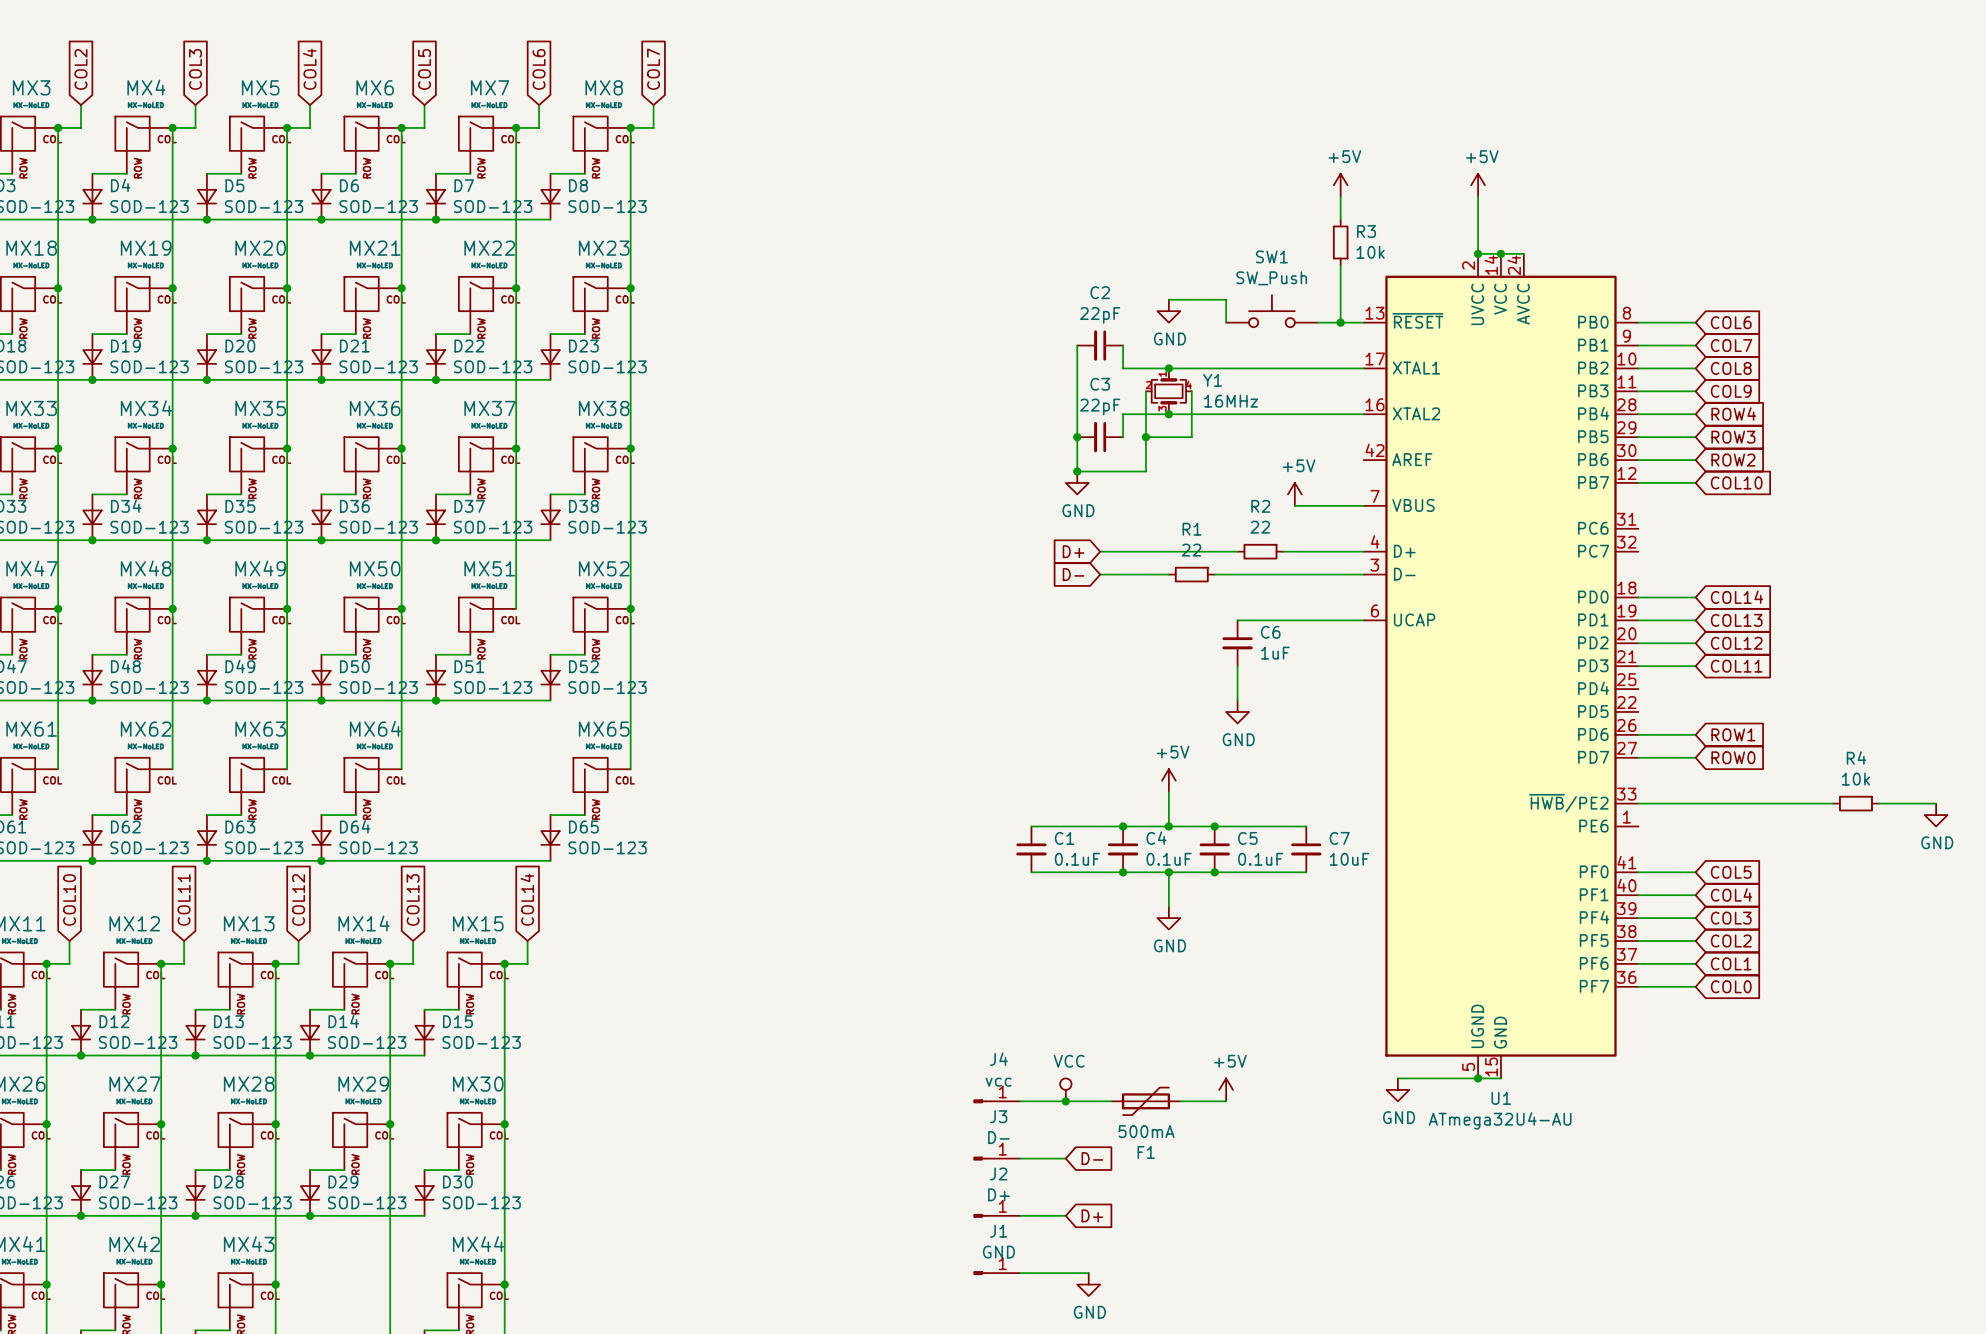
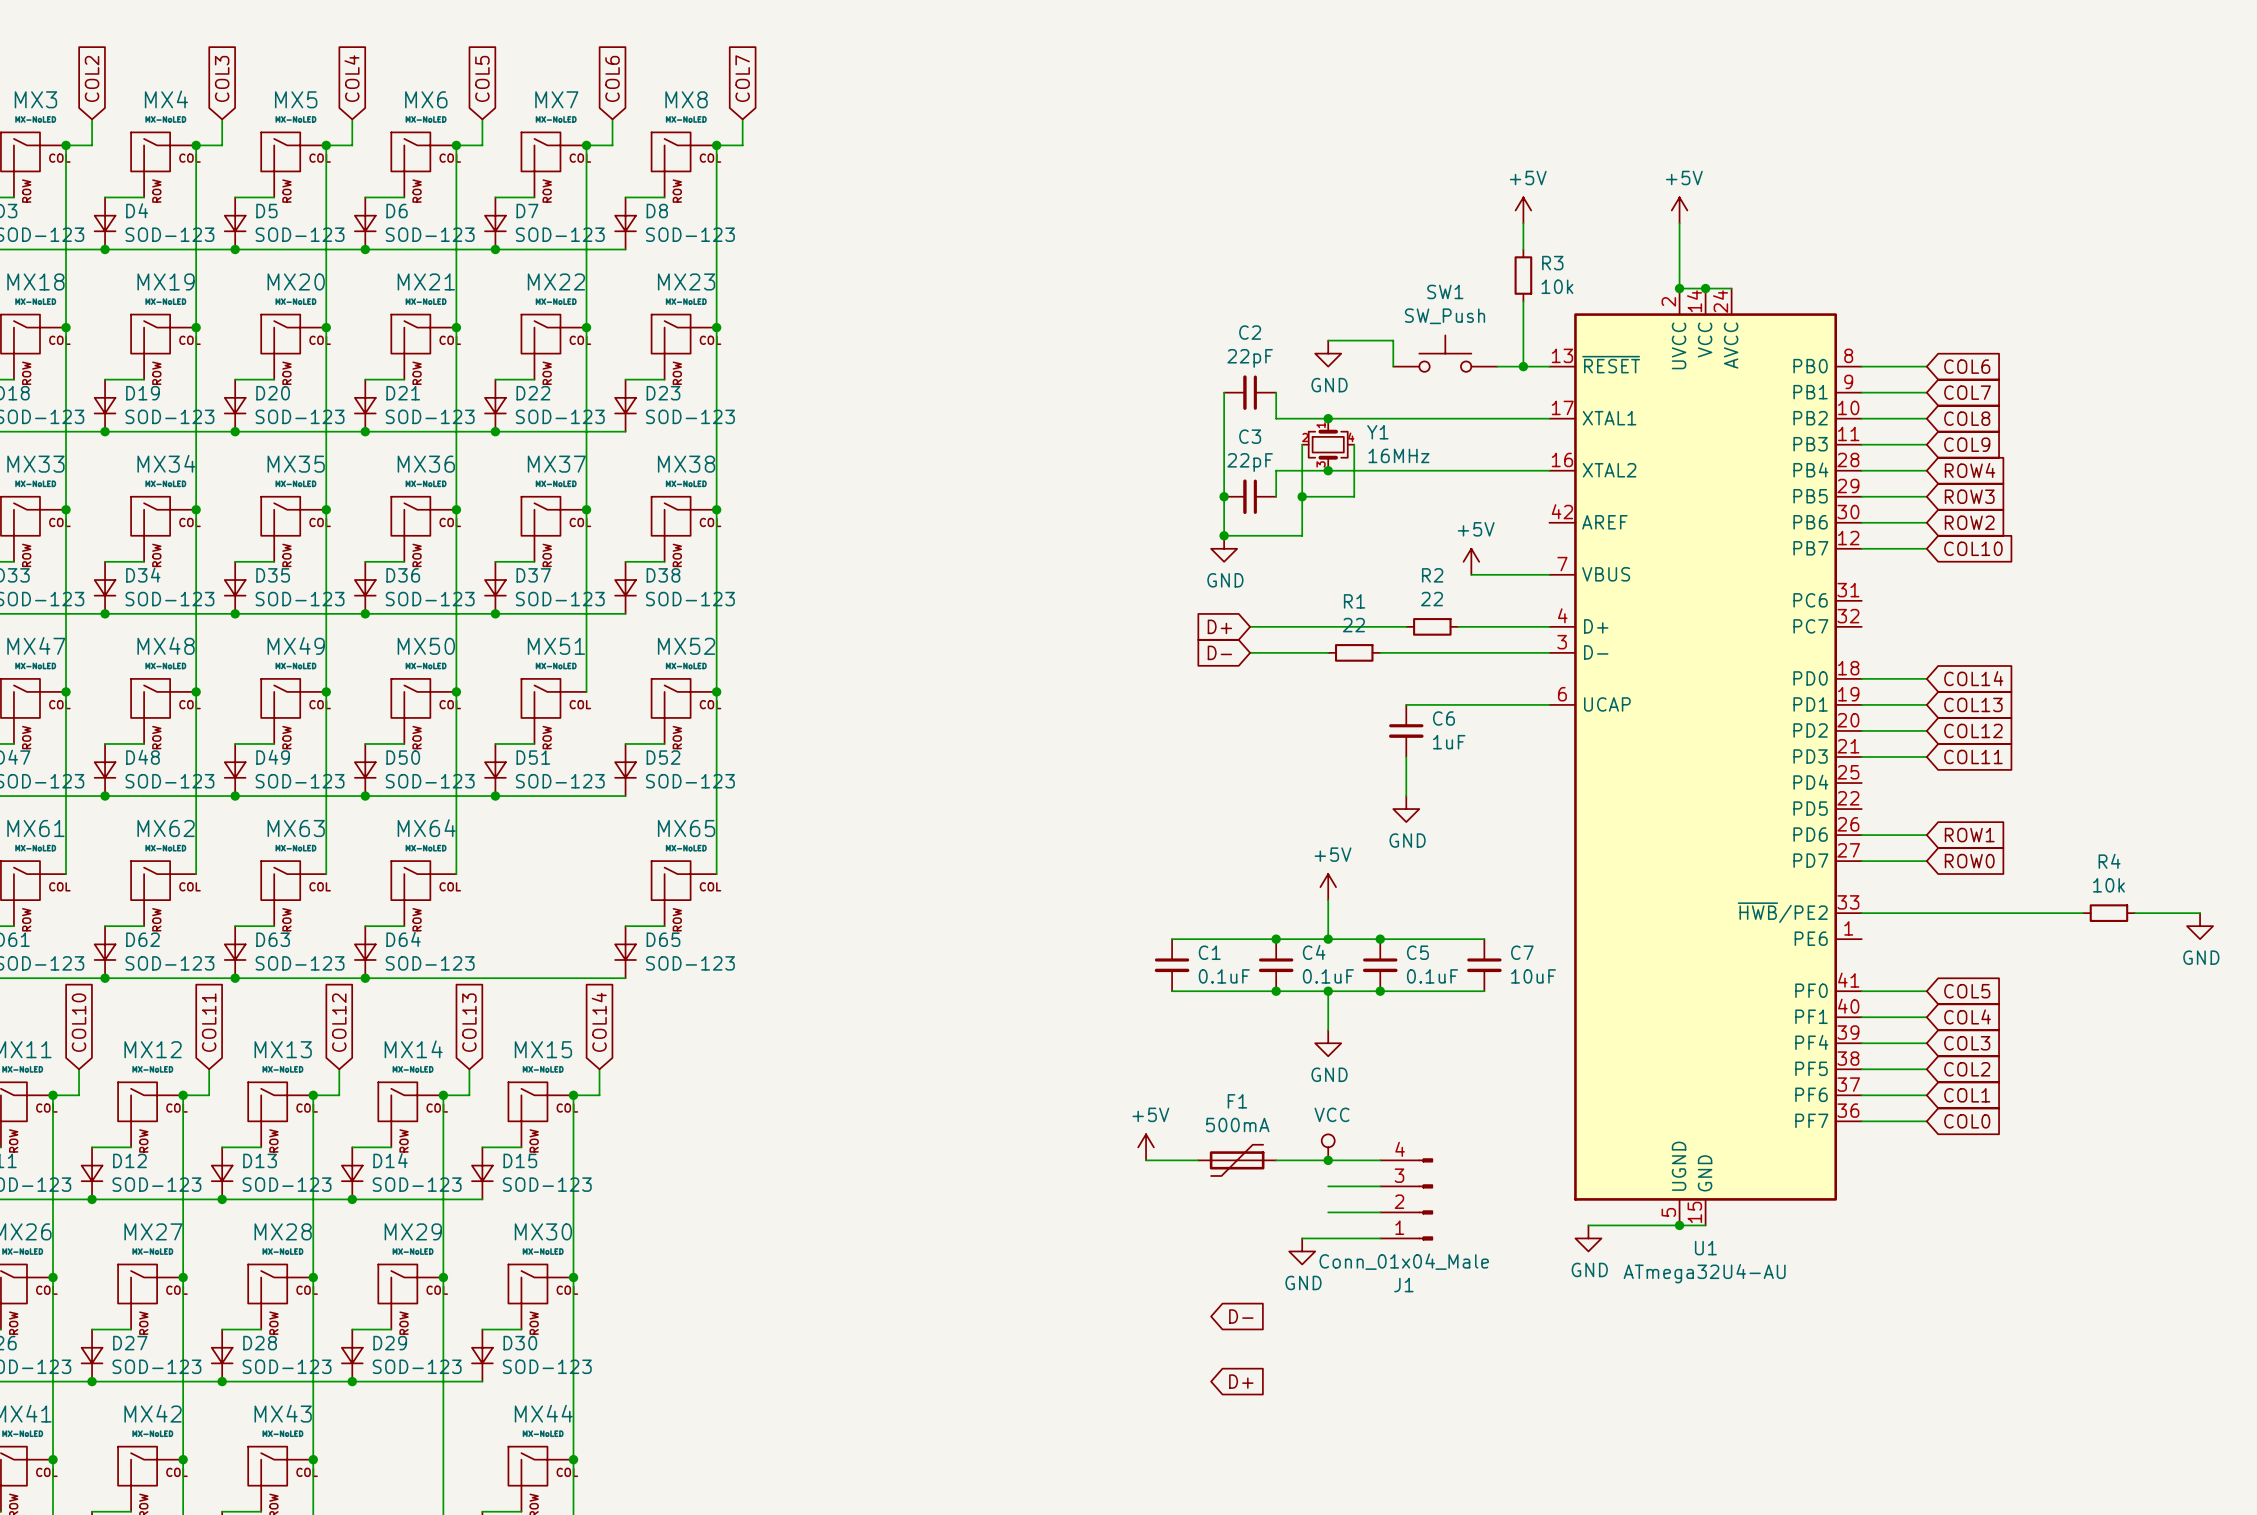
power symbol: none -> +5V (1146, 1147)
junction: none -> (1328, 1160)
wire: none -> (1328, 1186) (1380, 1186)
power symbol position: VCC (1065, 1089) -> VCC (1328, 1147)
power symbol: +5V (1226, 1089) -> none
J4: vcc (996, 1101) -> none
wire: (1020, 1101) (1111, 1101) -> (1276, 1160) (1380, 1160)
junction: (1065, 1101) -> none
F1 position: (1145, 1101) -> (1237, 1160)
wire: (1180, 1101) (1226, 1101) -> (1328, 1212) (1380, 1212)
F1 value position: 500mA (1146, 1131) -> 500mA (1237, 1125)
F1 name position: F1 (1146, 1152) -> F1 (1237, 1101)
J3: D- (996, 1158) -> none
wire: (1020, 1158) (1065, 1158) -> (1146, 1160) (1198, 1160)
J2: D+ (996, 1215) -> none
wire: (1020, 1215) (1065, 1215) -> none
J1 name position: J1 (998, 1231) -> J1 (1403, 1285)
J1 value: GND (998, 1252) -> Conn_01x04_Male (1404, 1261)
J1 symbol: [973, 1271, 1021, 1275] -> [1380, 1158, 1434, 1241]
wire: (1020, 1273) (1088, 1273) -> (1302, 1238) (1380, 1238)
power symbol position: GND (1088, 1284) -> GND (1302, 1251)

